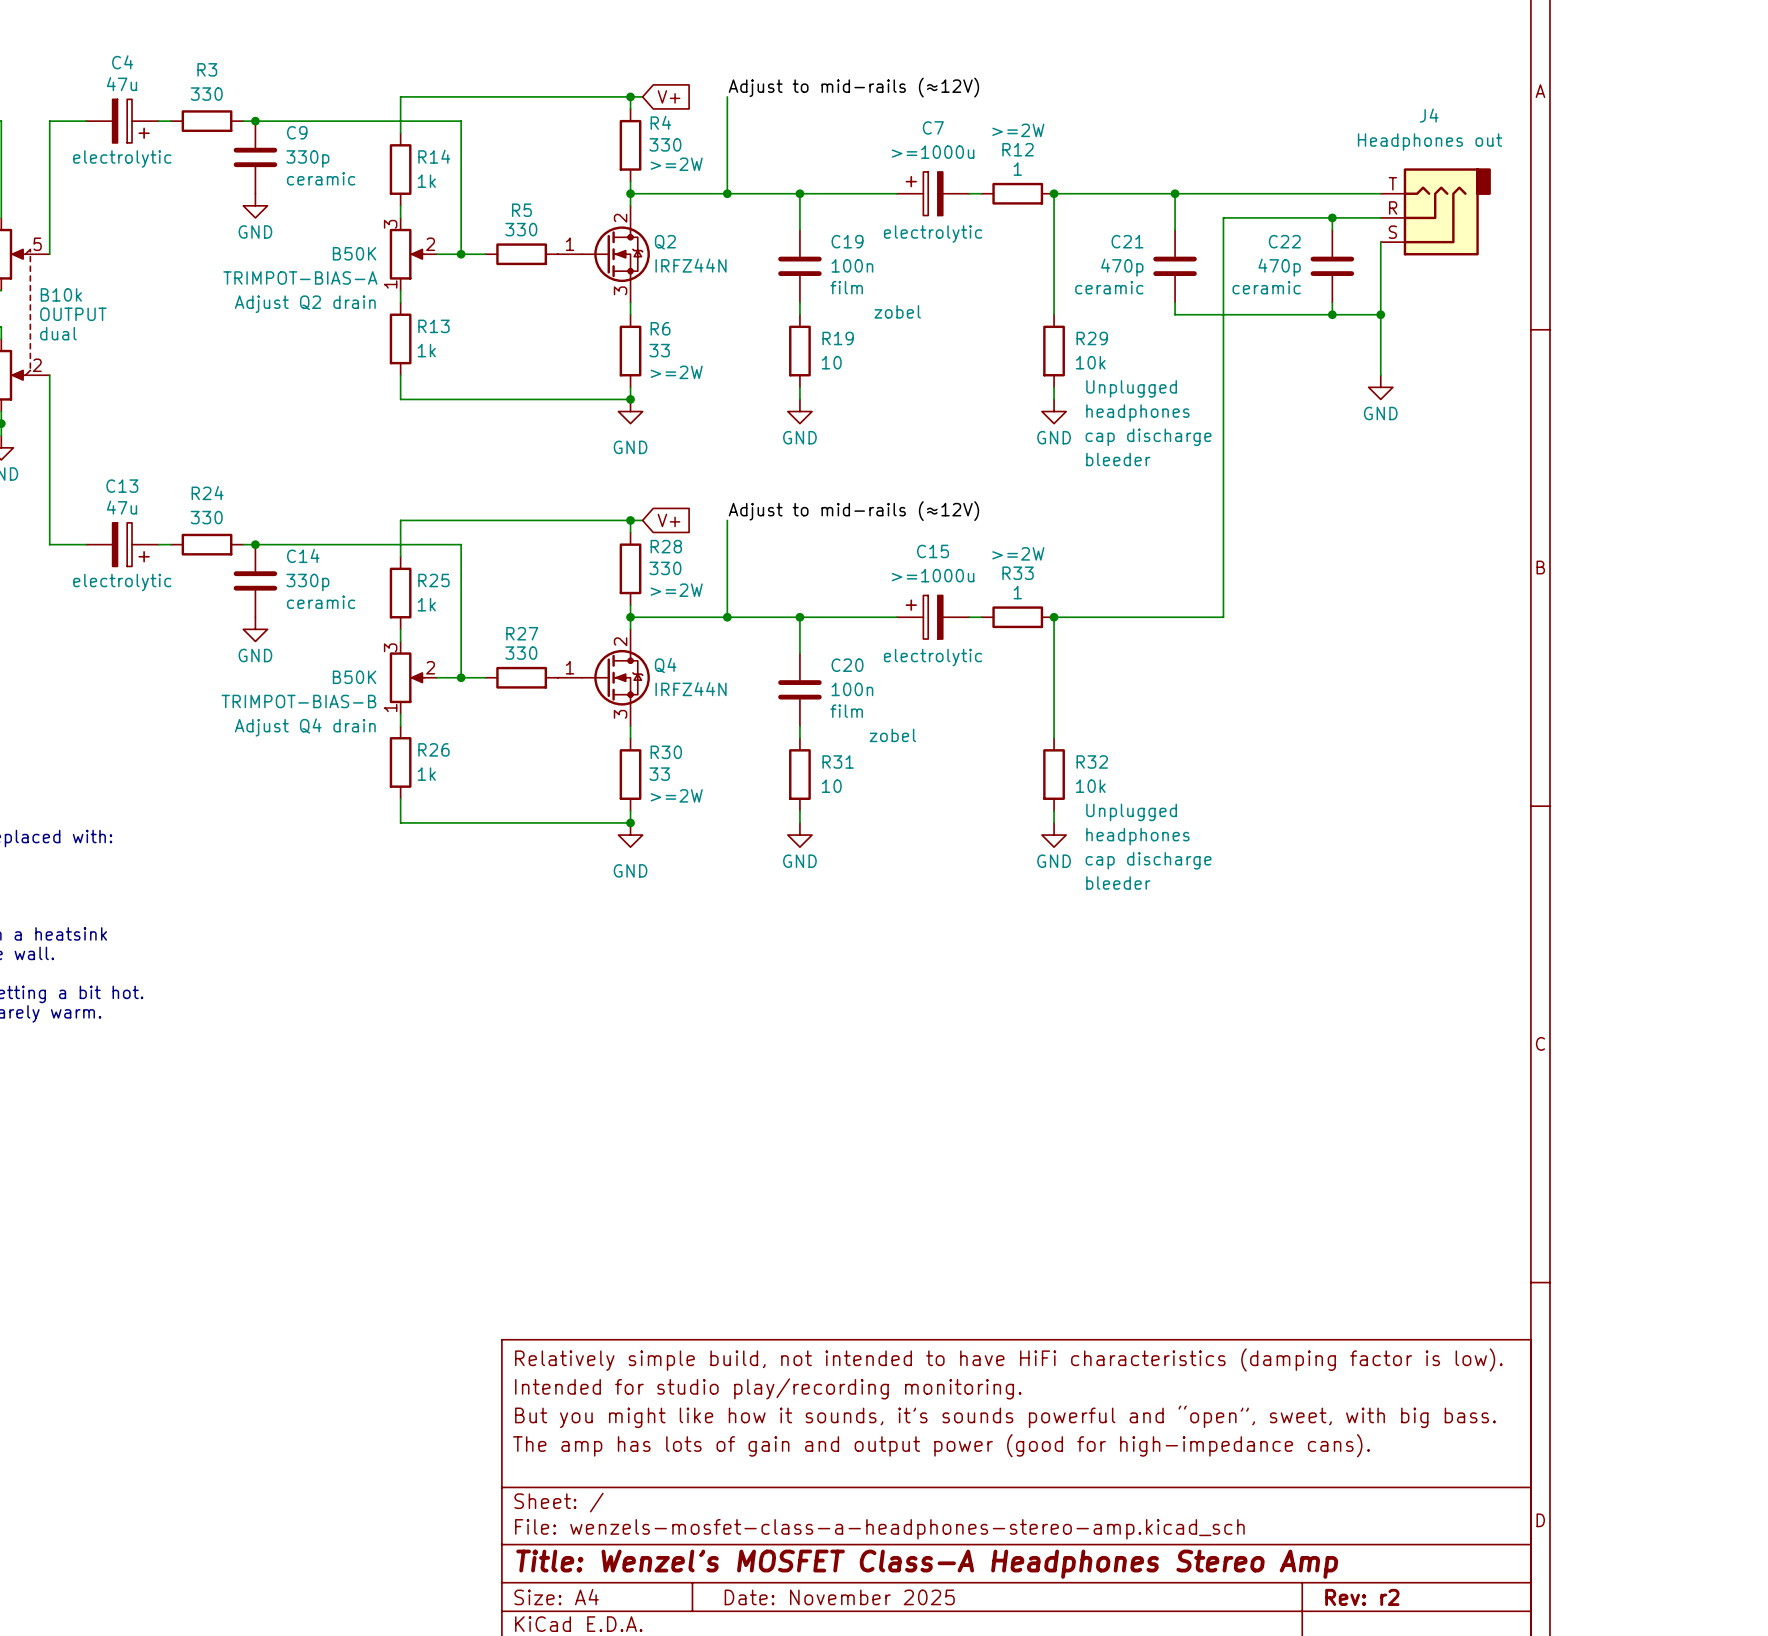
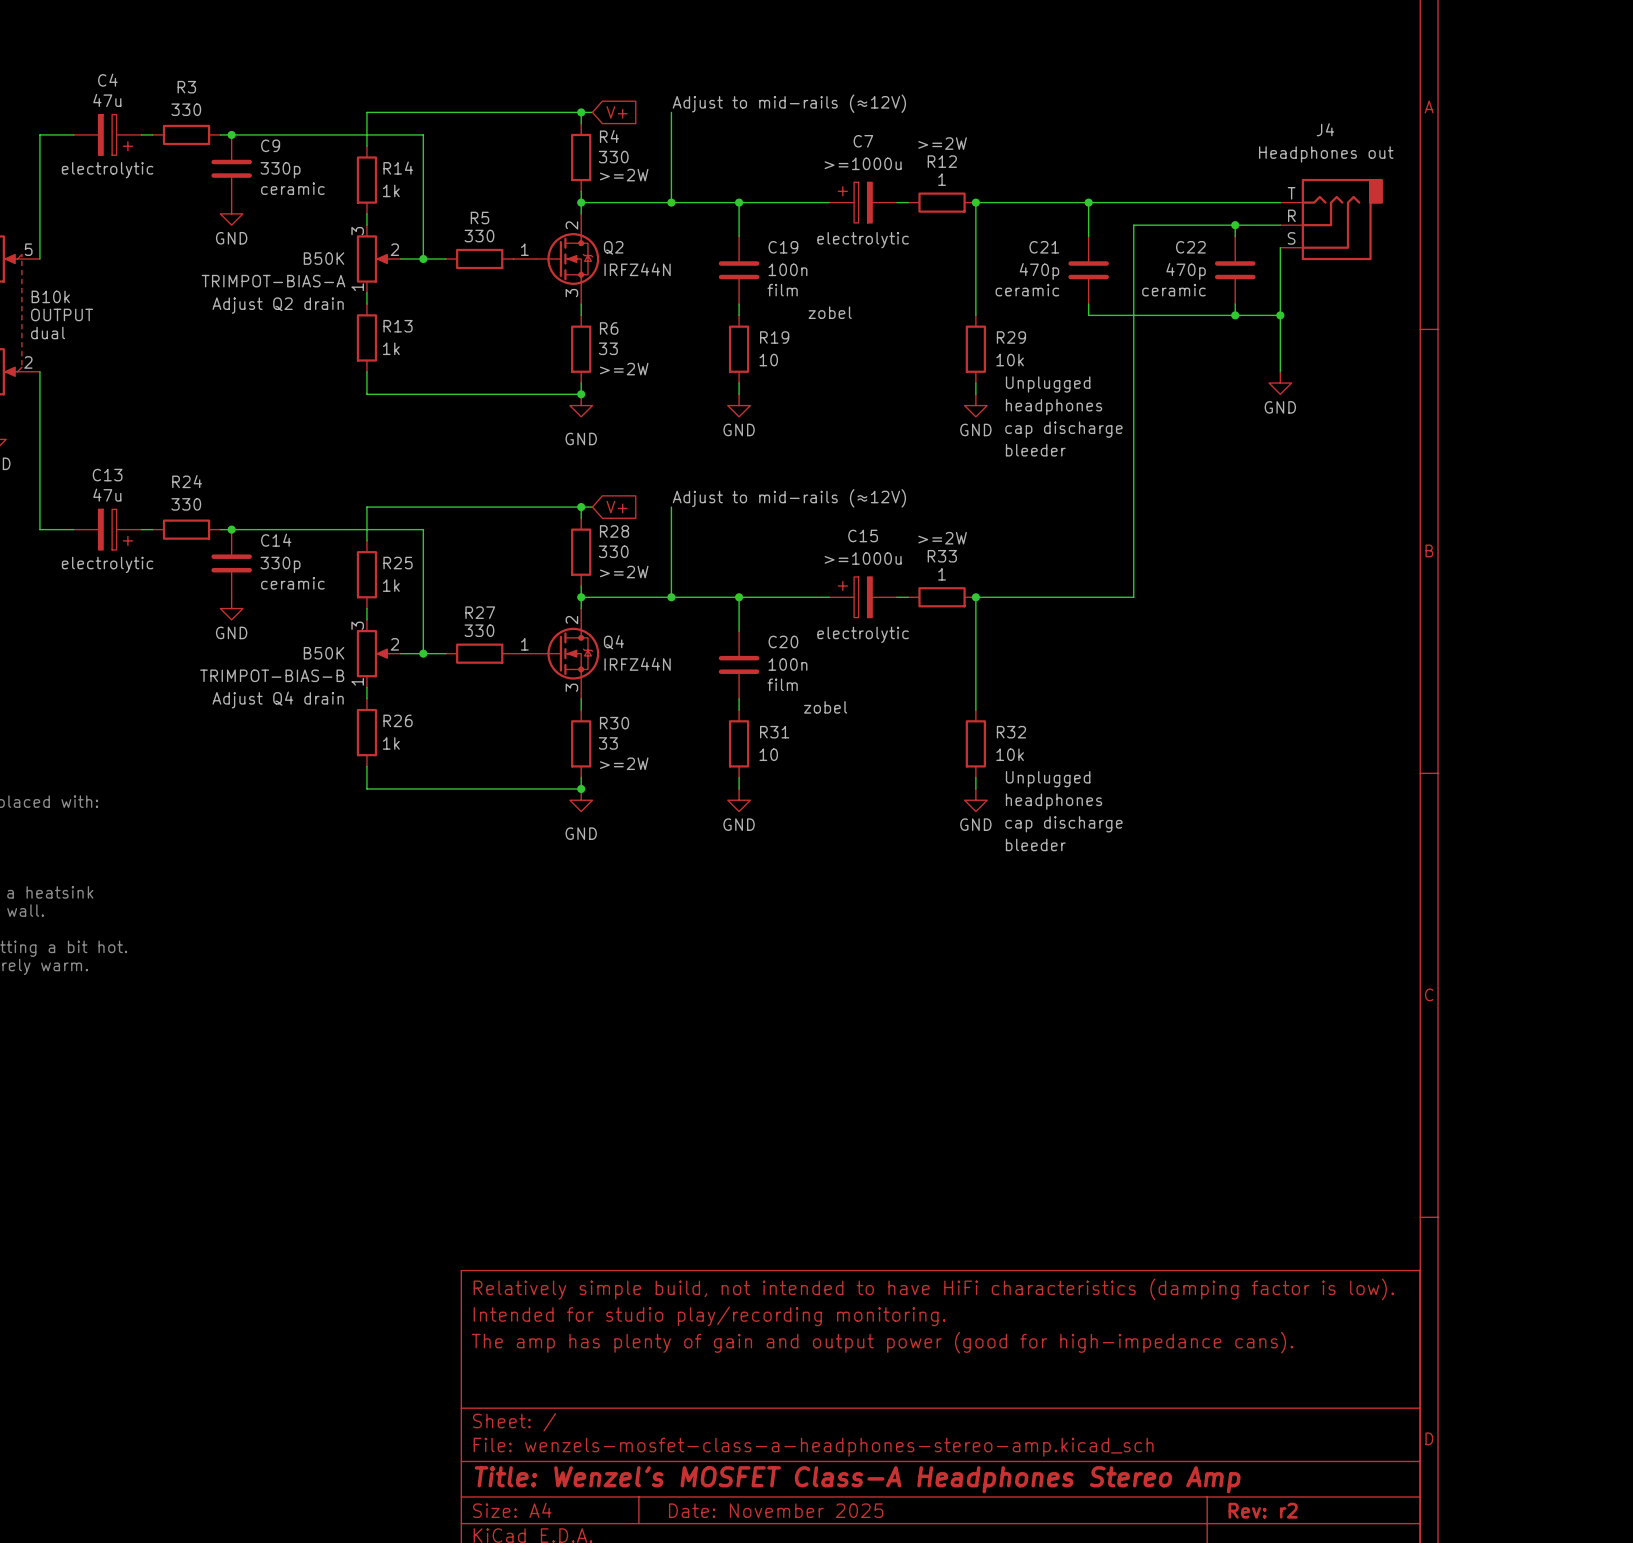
title block: But you might like how it sounds, it’s sounds powerful and “open”, sweet, with big bass. (1005, 1416) -> The amp has plenty of gain and output power (good for high-impedance cans). (882, 1342)
title block: The amp has lots of gain and output power (good for high-impedance cans). (941, 1445) -> none

